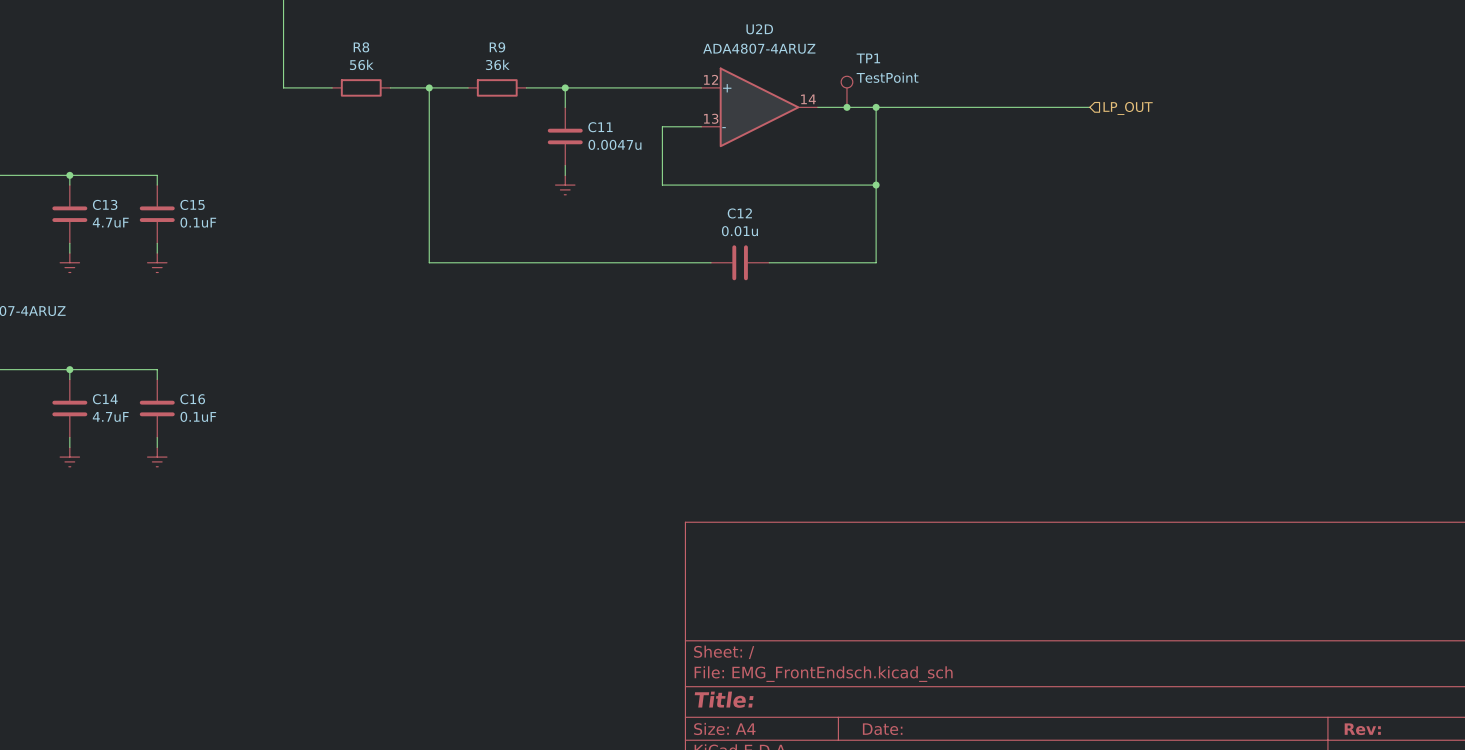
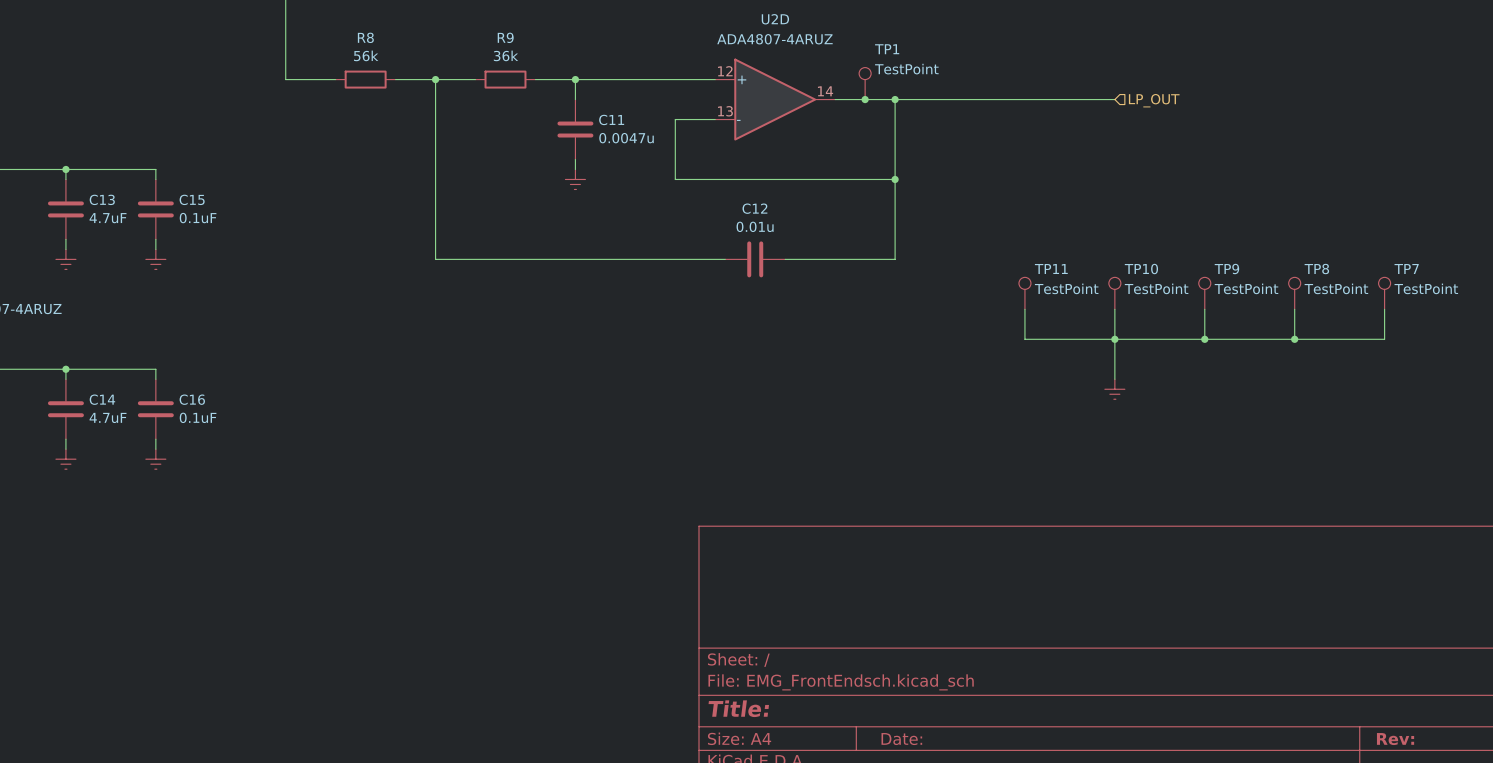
TP11: none -> TestPoint (1024, 293)
TP10: none -> TestPoint (1114, 293)
TP9: none -> TestPoint (1204, 293)
TP8: none -> TestPoint (1294, 293)
TP7: none -> TestPoint (1384, 293)
wire: none -> (1024, 309) (1024, 339) (1384, 339) (1384, 309)
wire: none -> (1114, 309) (1114, 379)
wire: none -> (1204, 309) (1204, 339)
wire: none -> (1294, 309) (1294, 339)
junction: none -> (1114, 339)
junction: none -> (1204, 339)
junction: none -> (1294, 339)
power symbol: none -> (1114, 389)

